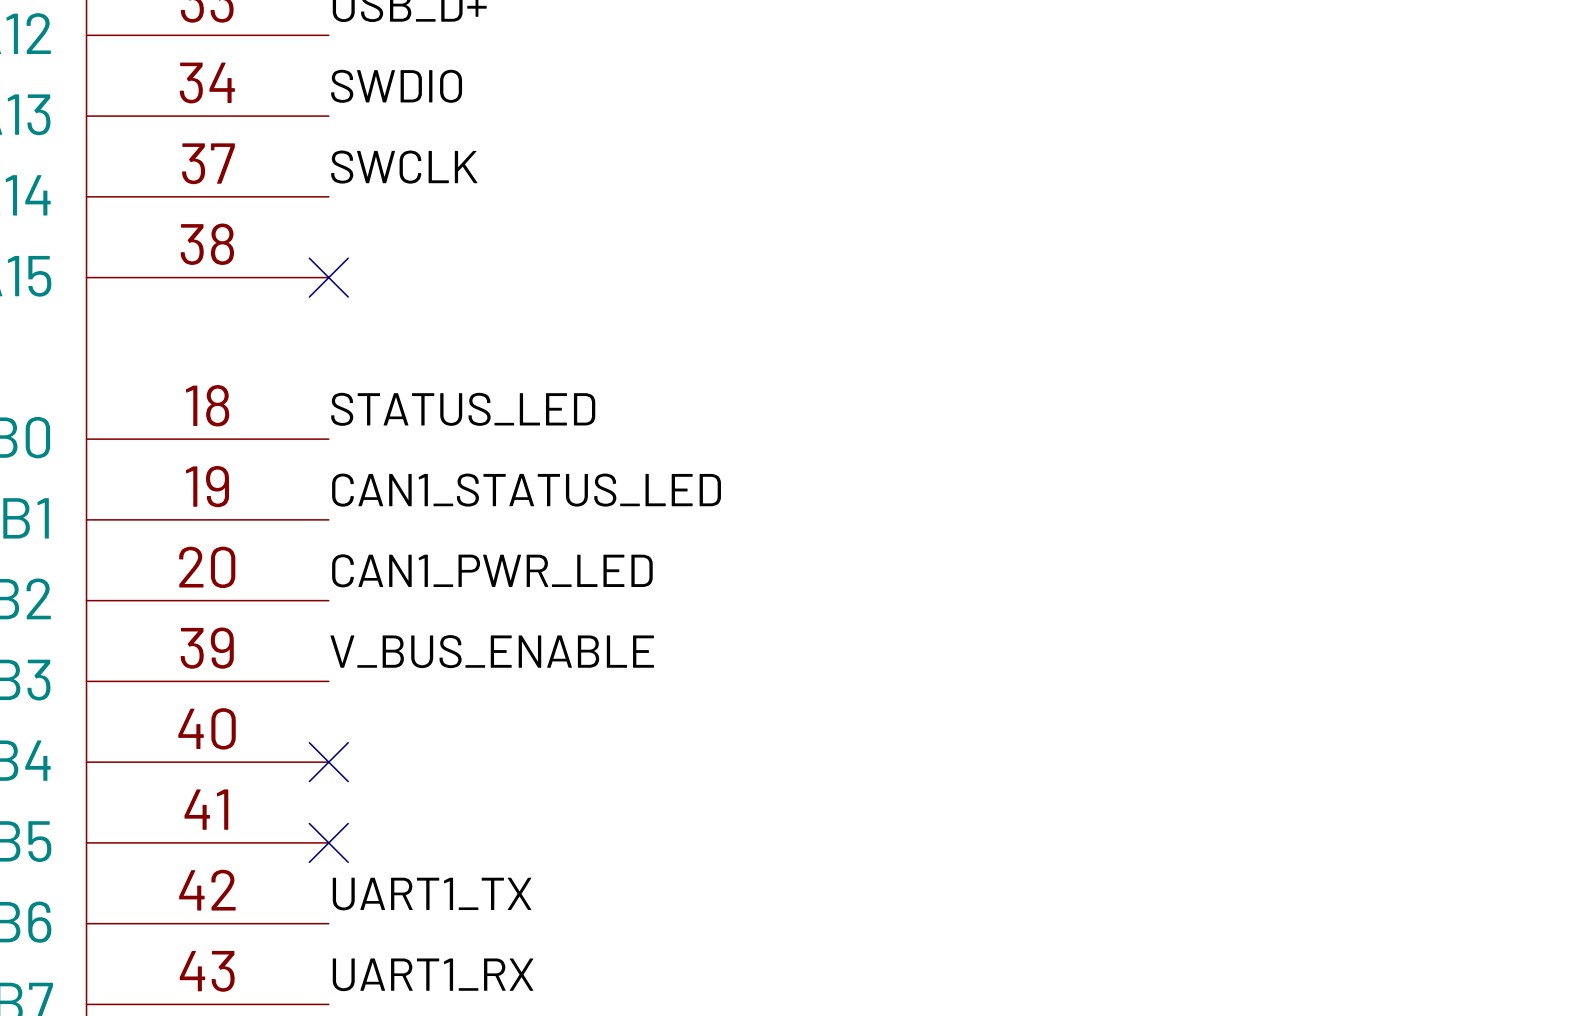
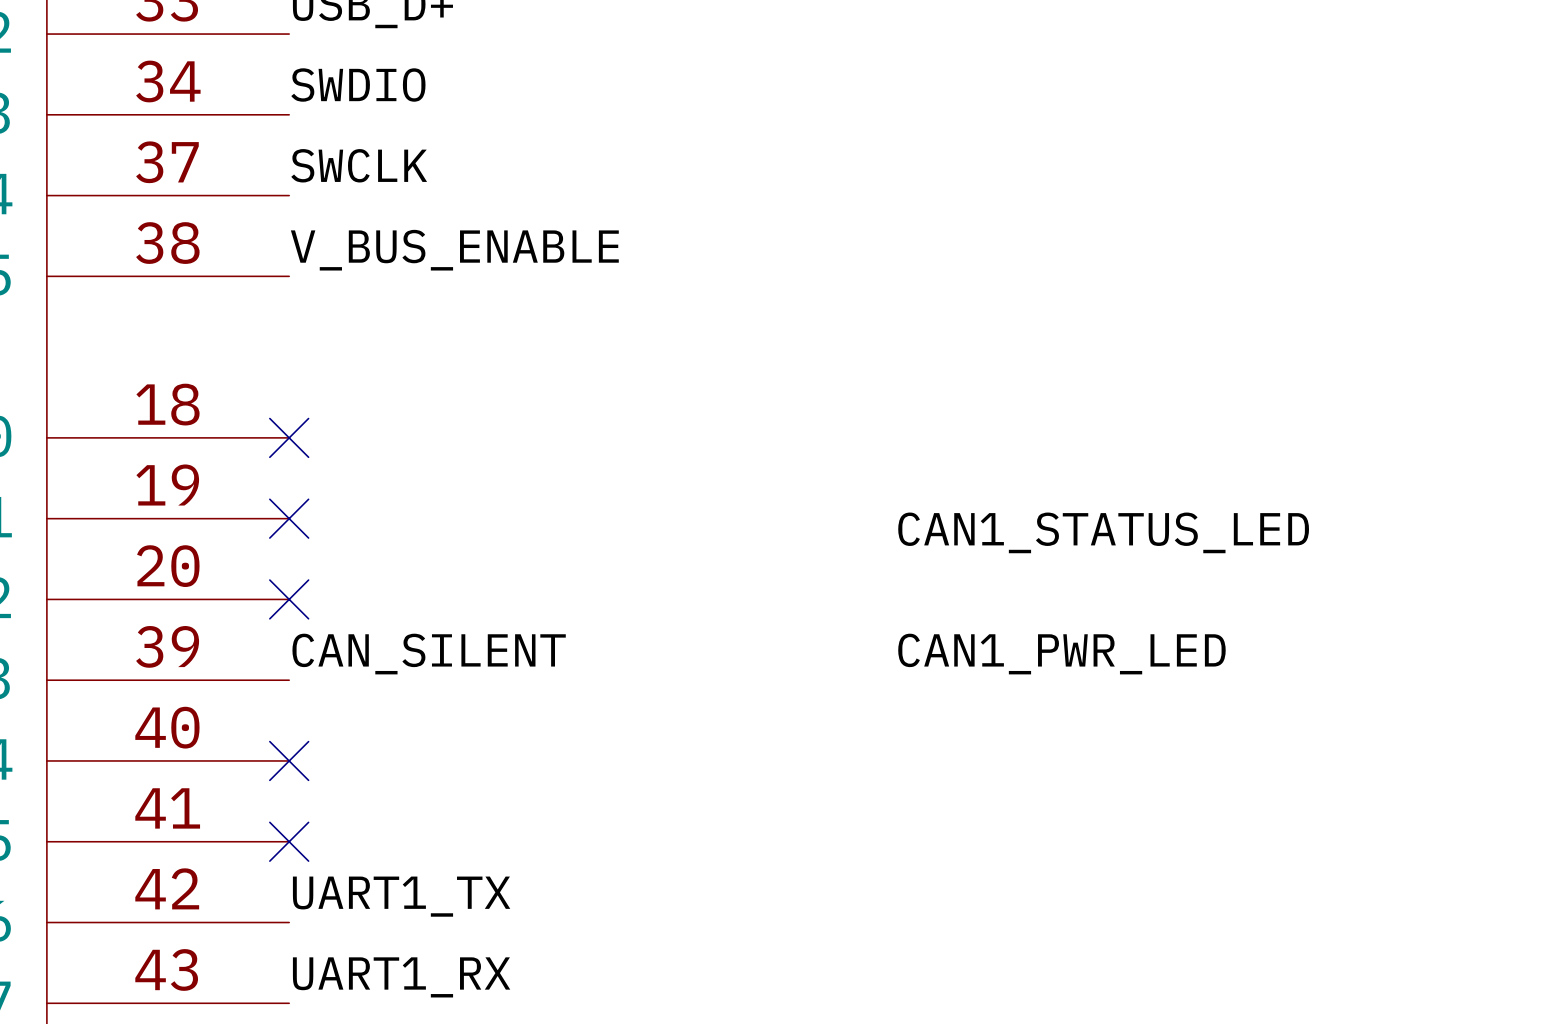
label: none -> V_BUS_ENABLE (454, 250)
no-connect mark: (328, 277) -> none
label: STATUS_LED (463, 409) -> none
no-connect mark: none -> (289, 437)
label position: CAN1_STATUS_LED (526, 490) -> CAN1_STATUS_LED (1103, 532)
no-connect mark: none -> (289, 518)
label position: CAN1_PWR_LED (492, 570) -> CAN1_PWR_LED (1061, 654)
no-connect mark: none -> (289, 599)
label: V_BUS_ENABLE (492, 651) -> CAN_SILENT (429, 654)

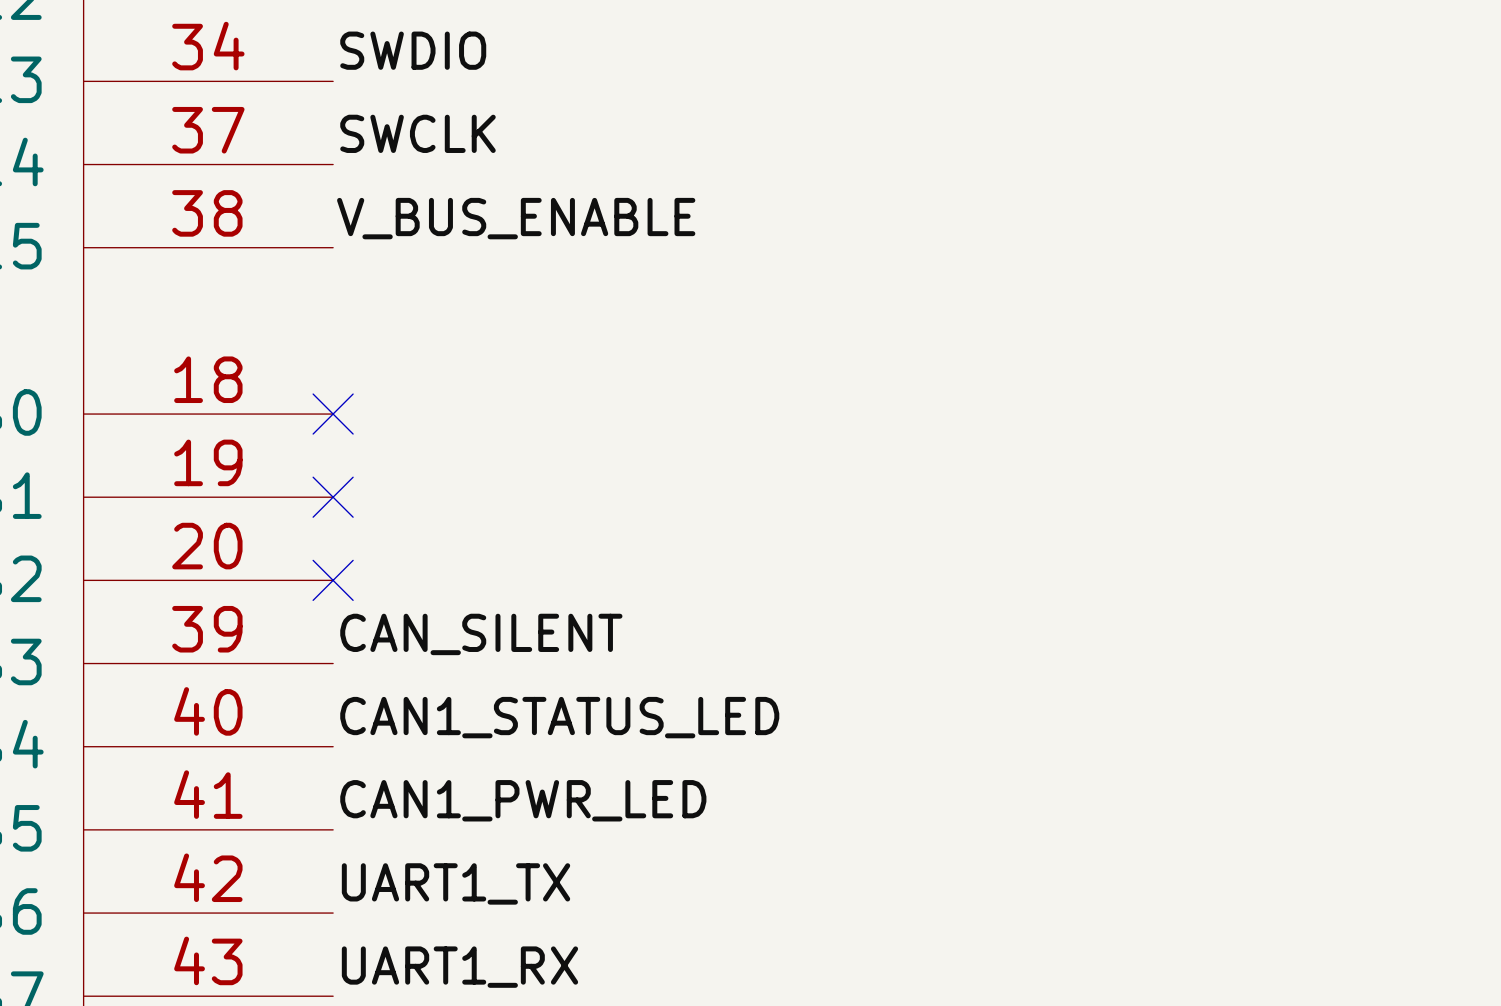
label position: CAN1_STATUS_LED (1103, 532) -> CAN1_STATUS_LED (559, 717)
label position: CAN1_PWR_LED (1061, 654) -> CAN1_PWR_LED (523, 800)
no-connect mark: (289, 760) -> none
no-connect mark: (289, 841) -> none

